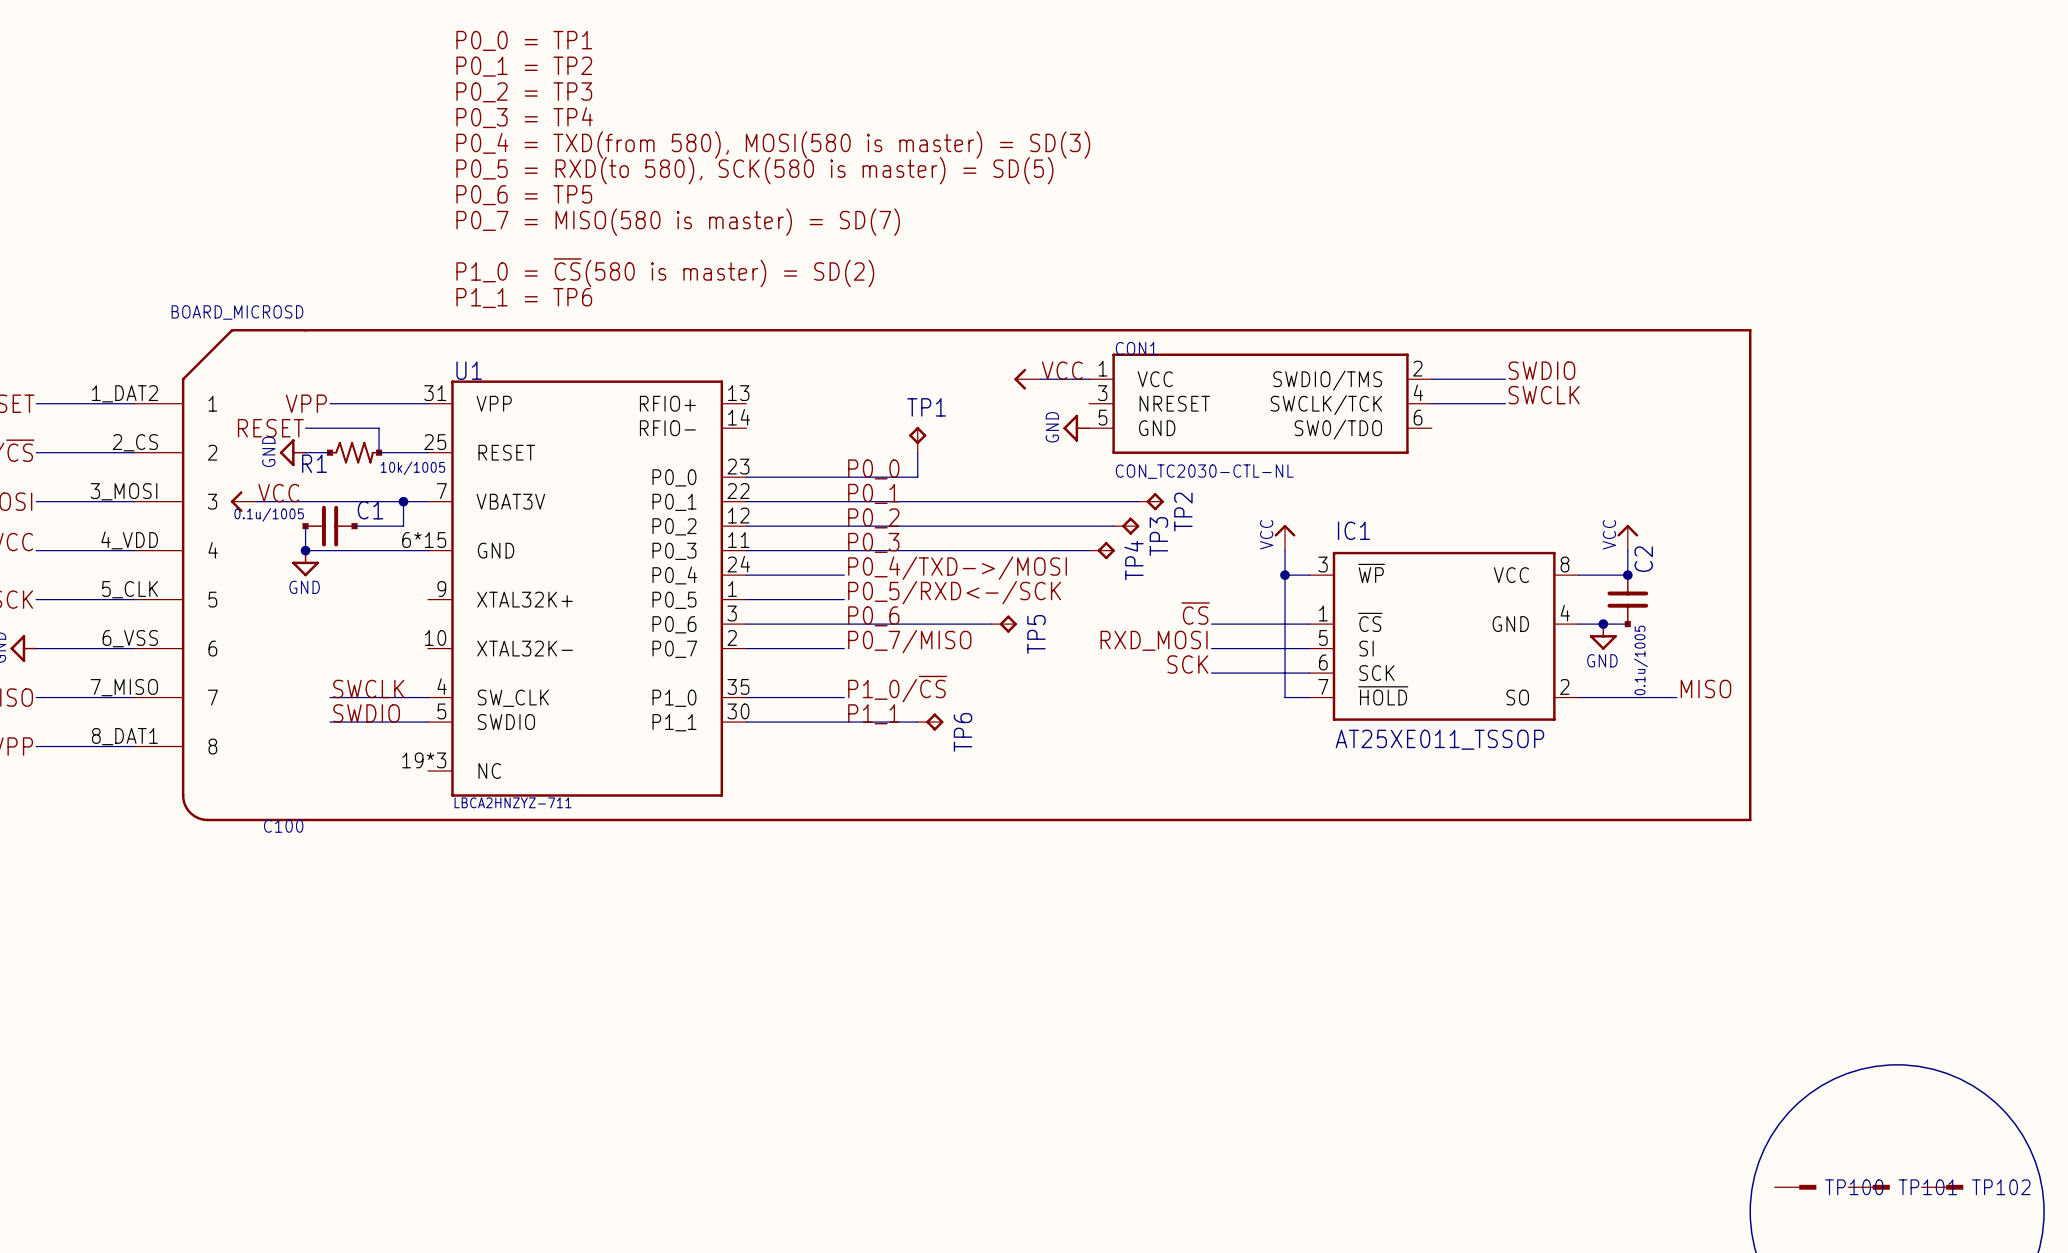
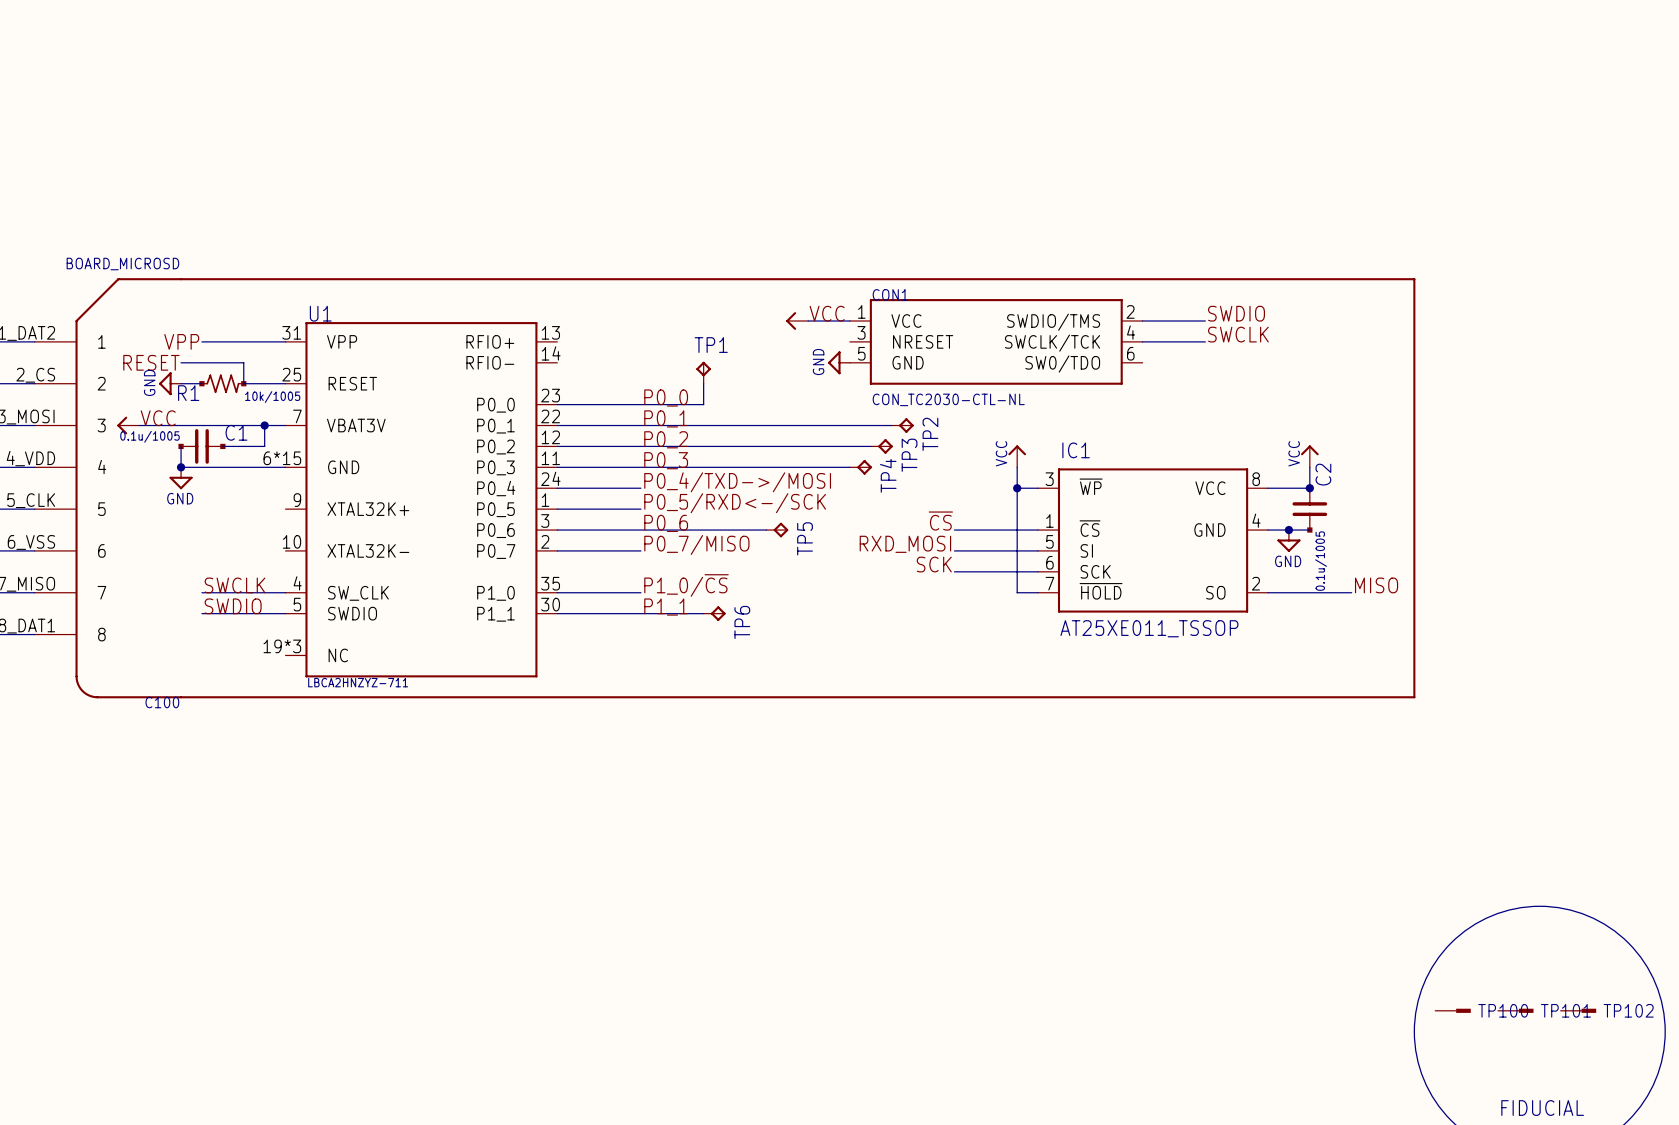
text: P0_0 = TP1 (524, 40) -> none
text: P0_1 = TP2 (524, 66) -> none
text: P0_2 = TP3 (524, 92) -> none
text: P0_3 = TP4 (524, 117) -> none
text: P0_4 = TXD(from 580), MOSI(580 is master) = SD(3) (773, 144) -> none
text: P0_5 = RXD(to 580), SCK(580 is master) = SD(5) (754, 170) -> none
text: P0_6 = TP5 (524, 195) -> none
text: P0_7 = MISO(580 is master) = SD(7) (678, 222) -> none
text: P1_0 = ~{CS}(580 is master) = SD(2) (665, 272) -> none
text: P1_1 = TP6 (524, 298) -> none

